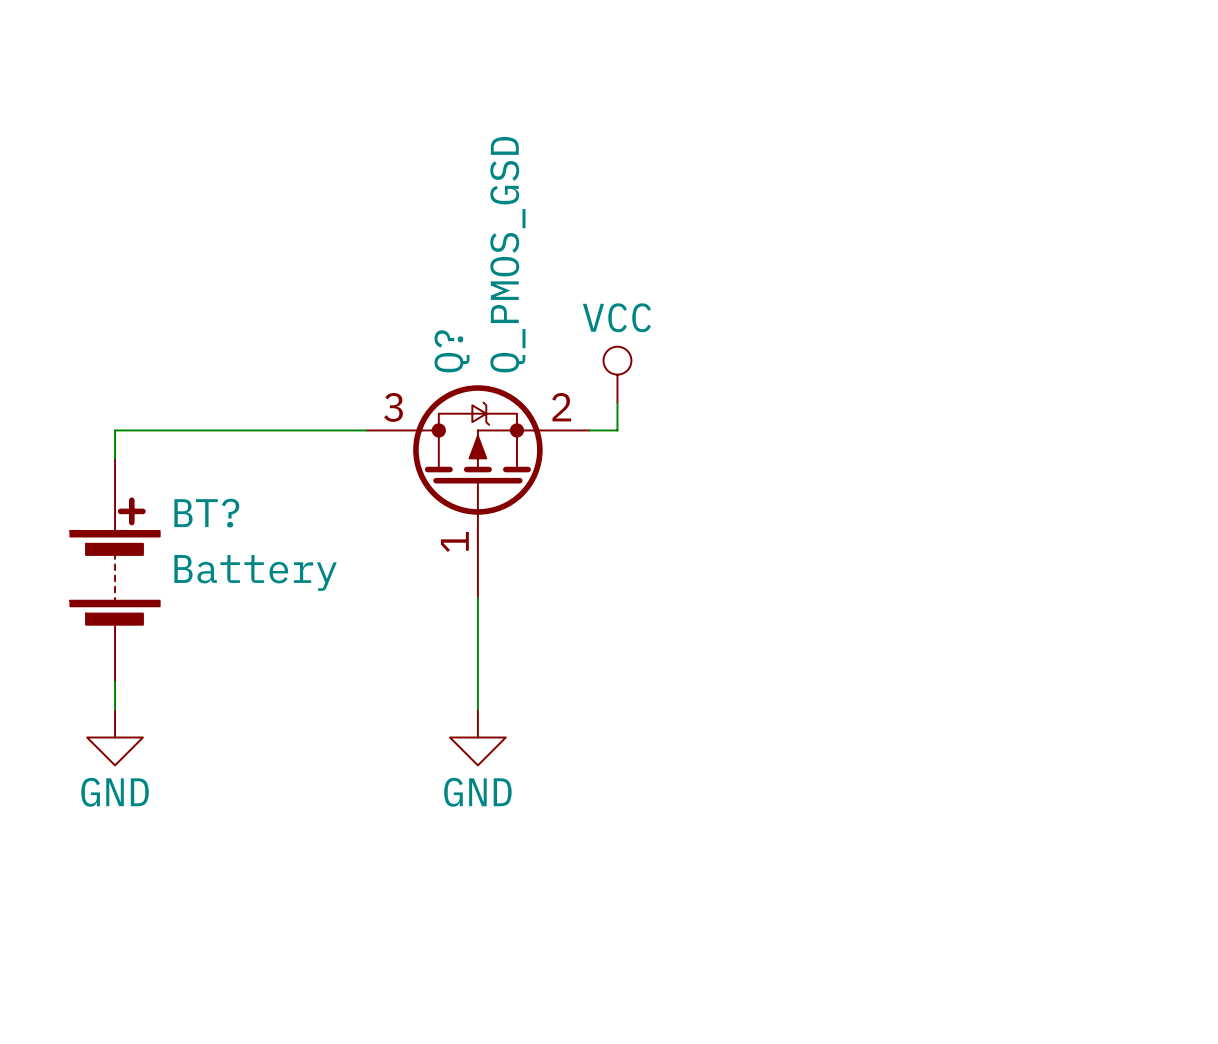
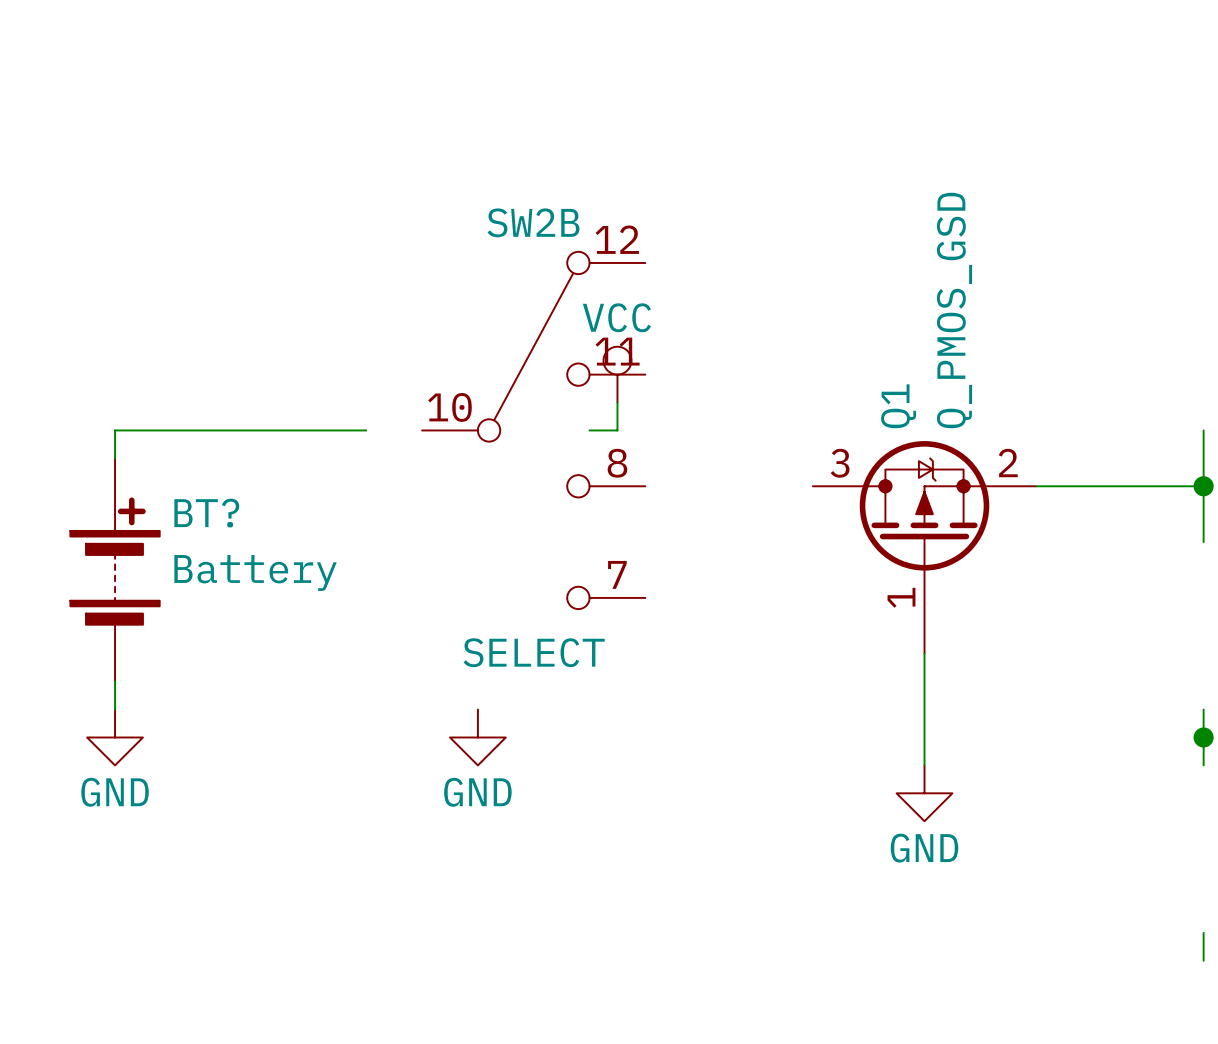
SW2B: none -> SELECT (533, 430)
wire: none -> (1203, 430) (1203, 542)
wire: none -> (1036, 486) (1203, 486)
junction: none -> (1203, 486)
Q?: Q_PMOS_GSD (477, 491) -> none
Q1: none -> Q_PMOS_GSD (924, 547)
wire: (477, 597) (477, 709) -> (924, 653) (924, 765)
wire: none -> (1203, 709) (1203, 765)
junction: none -> (1203, 737)
power symbol: none -> GND (924, 793)
wire: none -> (1203, 932) (1203, 960)

